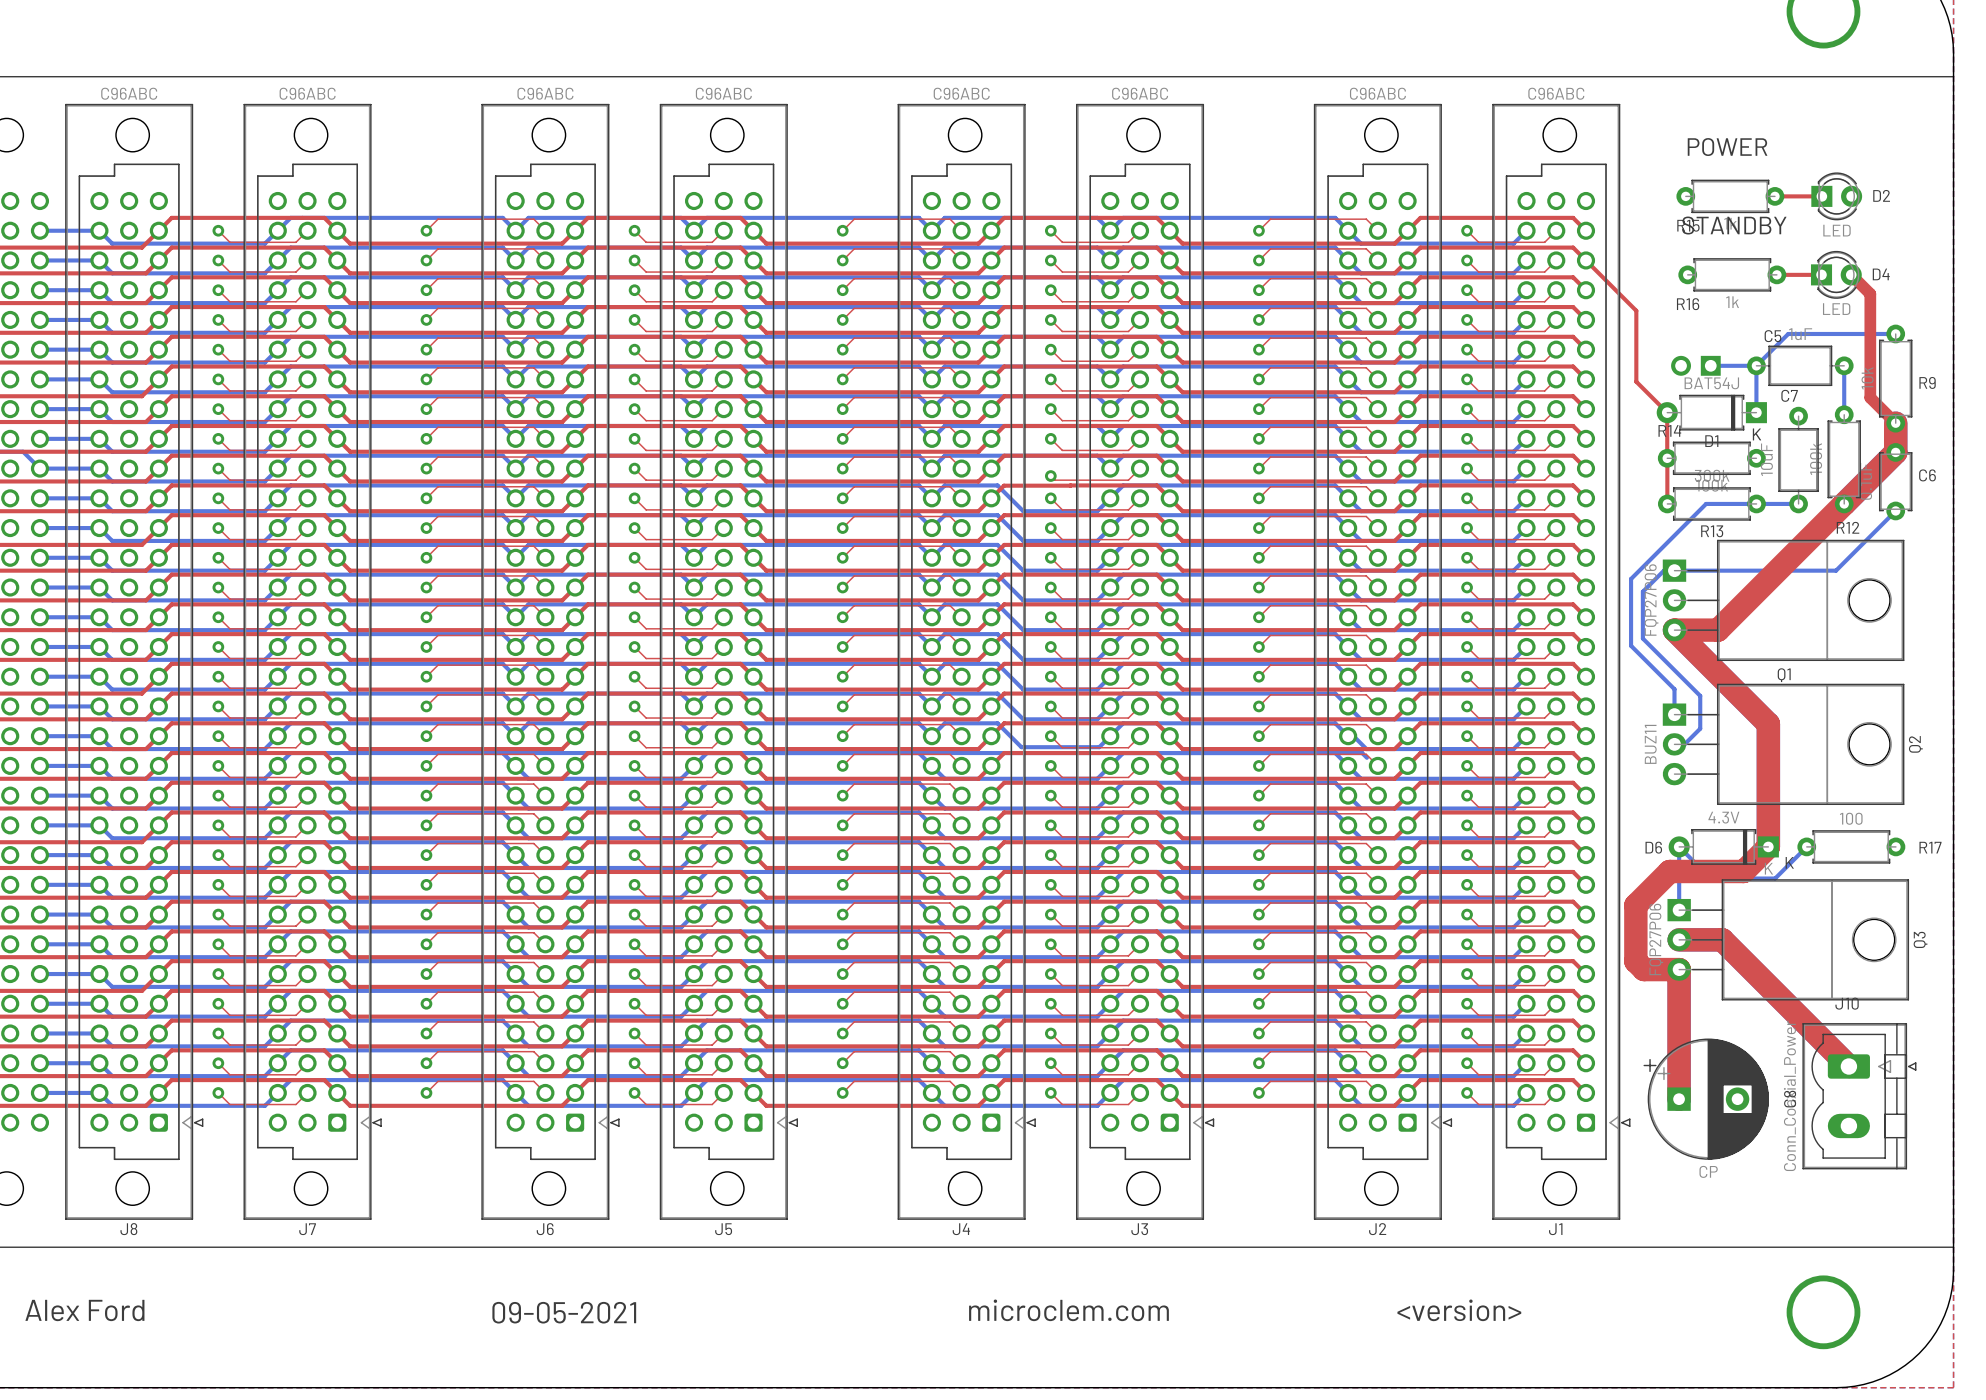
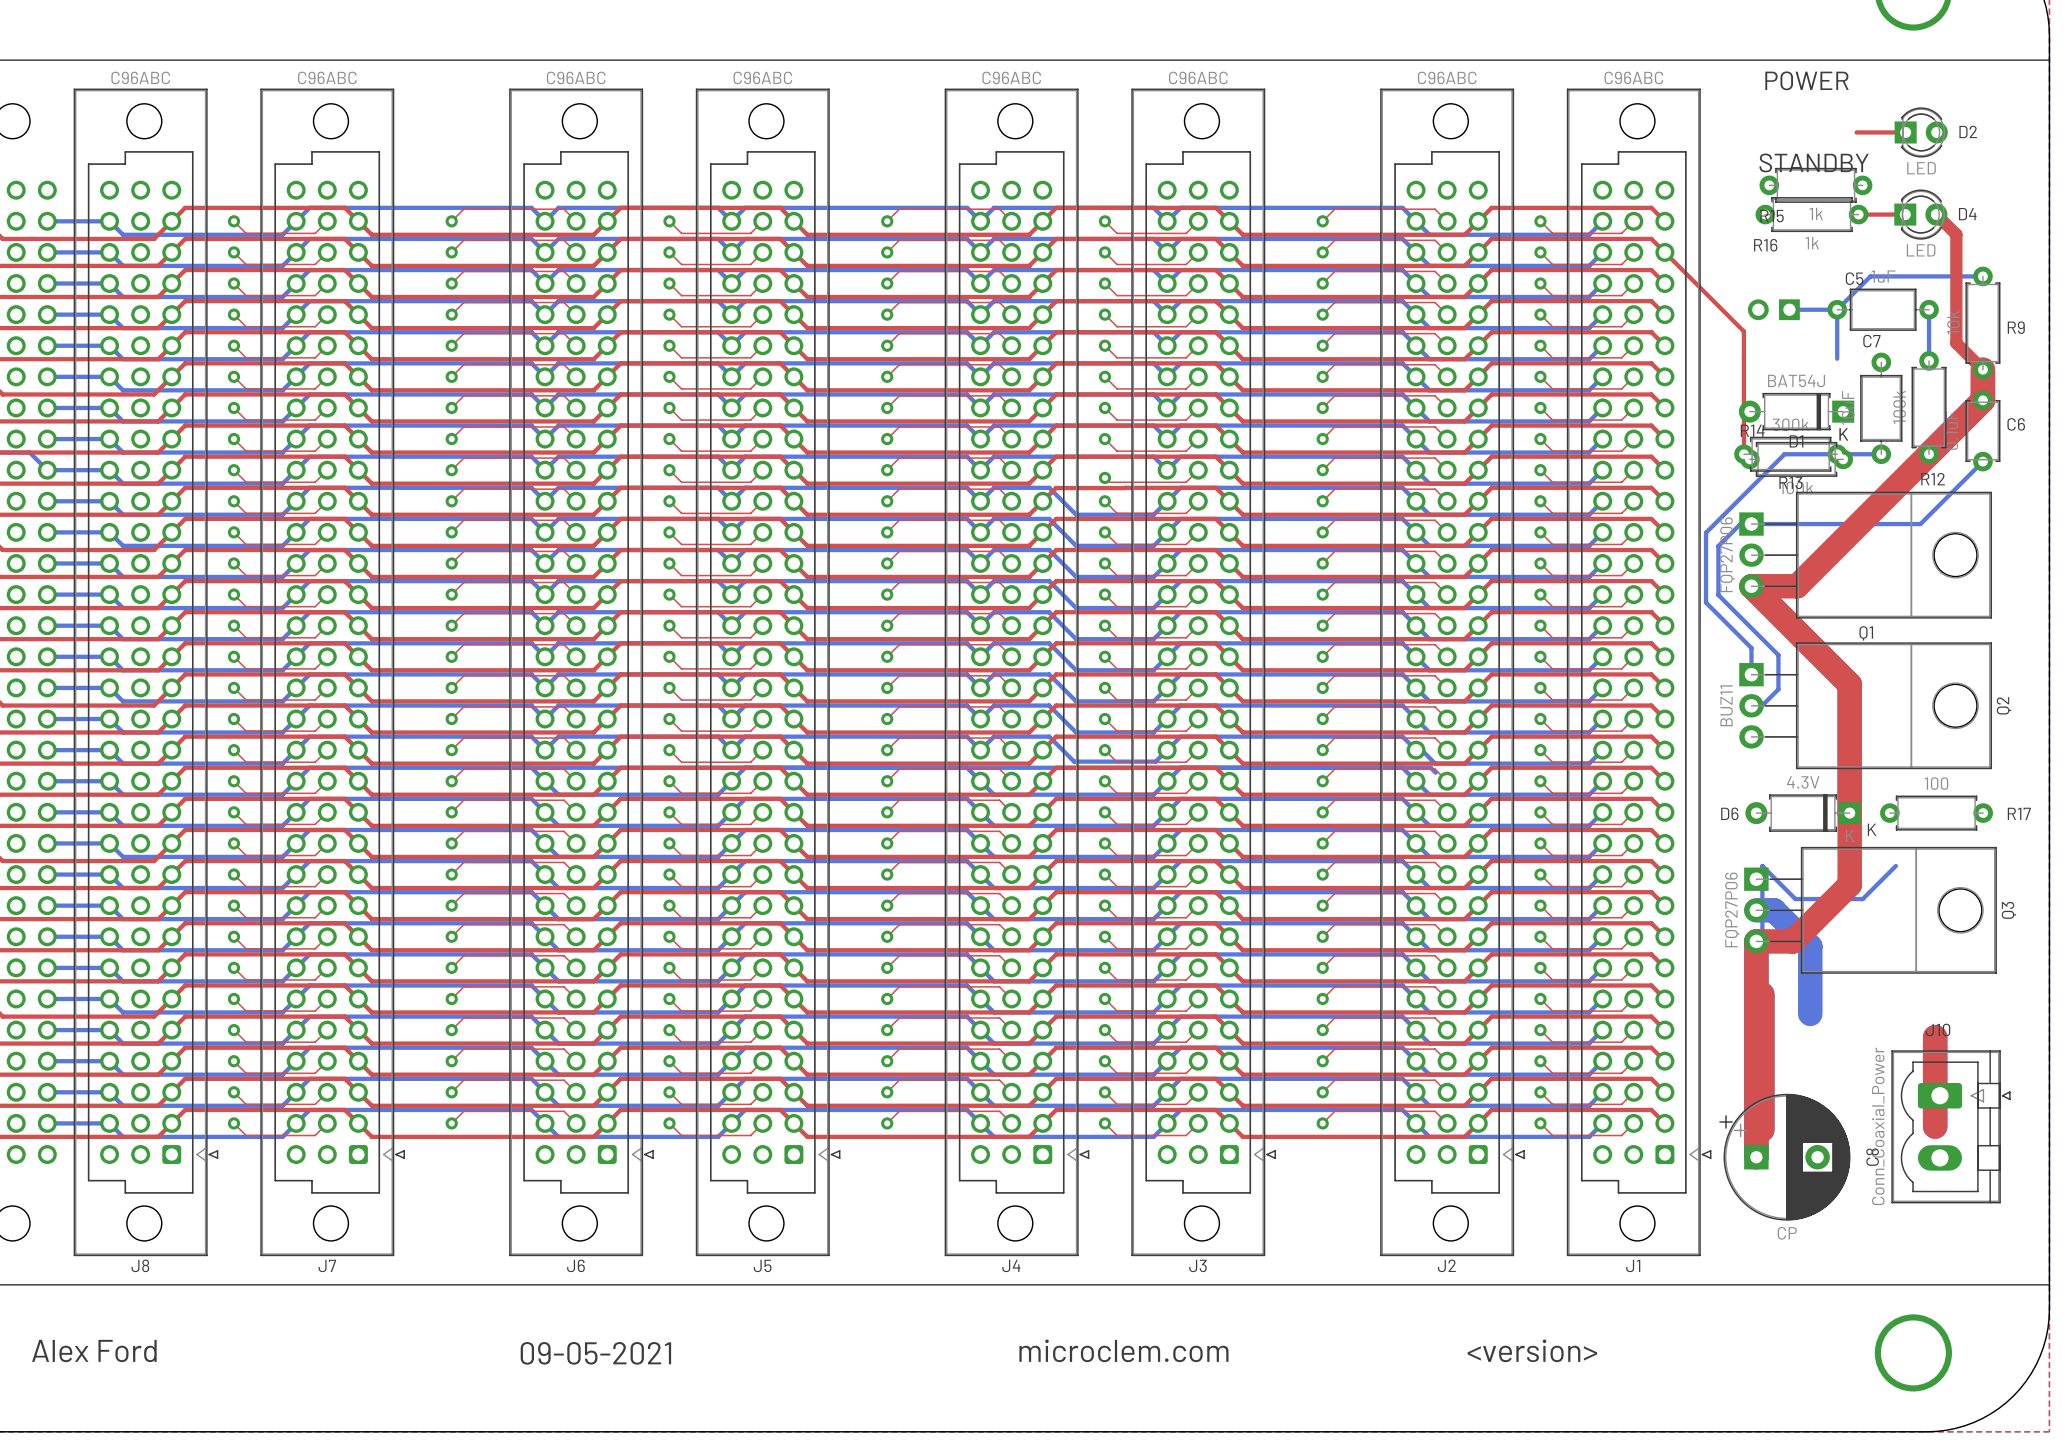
text position: POWER (1727, 147) -> POWER (1806, 80)
top track: (1774, 196) (1821, 196) -> (1856, 132) (1905, 132)
D2 position: (1836, 196) -> (1921, 132)
top track: none -> (1936, 214) (1956, 234) (1956, 343) (1982, 369) (1982, 400) (1797, 586) (1751, 586) (1849, 684) (1849, 884) (1793, 941) (1756, 941) (1756, 1157)
text position: STANDBY (1734, 225) -> STANDBY (1814, 162)
R16 position: (1732, 274) -> (1811, 214)
top track: (1776, 274) (1821, 274) -> (1858, 214) (1905, 214)
D4 position: (1836, 274) -> (1920, 214)
top track: (1851, 274) (1870, 293) (1870, 397) (1895, 423) (1895, 452) (1718, 630) (1674, 630) (1768, 724) (1768, 846) (1743, 871) (1669, 871) (1635, 905) (1635, 961) (1644, 969) (1679, 969) -> none
top track: (1636, 310) (1636, 381) (1667, 412) (1667, 458) -> (1717, 305) (1743, 331) (1743, 406)
bottom track: (1895, 333) (1788, 333) (1756, 365) -> (1982, 276) (1870, 276) (1837, 309)
part position: (1695, 365) -> (1773, 309)
bottom track: (1710, 365) (1756, 365) -> (1789, 309) (1837, 309)
bottom track: (1756, 365) (1756, 412) -> (1837, 309) (1837, 358)
C5 position: (1800, 365) -> (1883, 309)
bottom track: (1844, 365) (1844, 414) -> (1929, 309) (1929, 360)
R9 position: (1895, 378) -> (1982, 323)
top track: (1667, 458) (1667, 503) -> (1744, 406) (1744, 454)
R12 position: (1844, 459) -> (1929, 407)
C7 position: (1798, 460) -> (1881, 408)
C6 position: (1895, 481) -> (1982, 430)
R13 position: (1711, 503) -> (1790, 454)
bottom track: (1798, 503) (1706, 503) (1631, 578) (1631, 645) (1674, 689) (1674, 714) -> (1881, 454) (1784, 454) (1706, 532) (1706, 602) (1751, 648) (1751, 674)
bottom track: (1895, 510) (1836, 570) (1663, 570) (1642, 591) (1642, 638) (1700, 695) (1700, 728) (1684, 744) (1674, 744) -> (1982, 461) (1920, 524) (1740, 524) (1718, 546) (1718, 595) (1778, 655) (1778, 689) (1762, 705) (1751, 705)
Q1 position: (1783, 600) -> (1865, 555)
Q2 position: (1783, 744) -> (1865, 705)
D6 position: (1723, 846) -> (1803, 813)
R17 position: (1851, 846) -> (1936, 813)
bottom track: none -> (1756, 910) (1774, 910) (1810, 946) (1810, 1013)
top track: (1679, 939) (1722, 939) (1848, 1066) -> none
Q3 position: (1788, 939) -> (1870, 910)
top track: none -> (1935, 1037) (1935, 1126)
C8 position: (1706, 1099) -> (1784, 1157)

